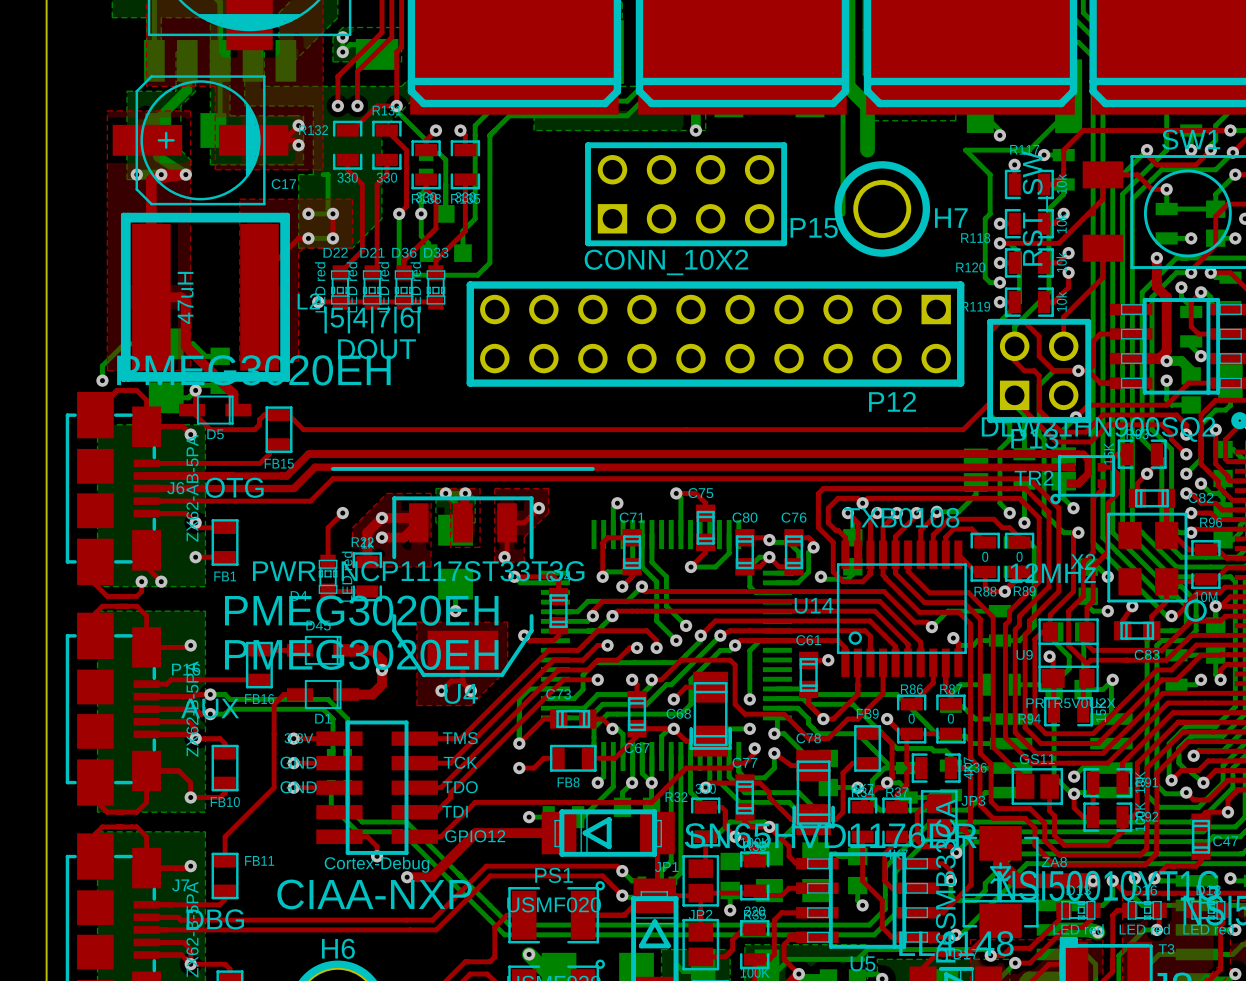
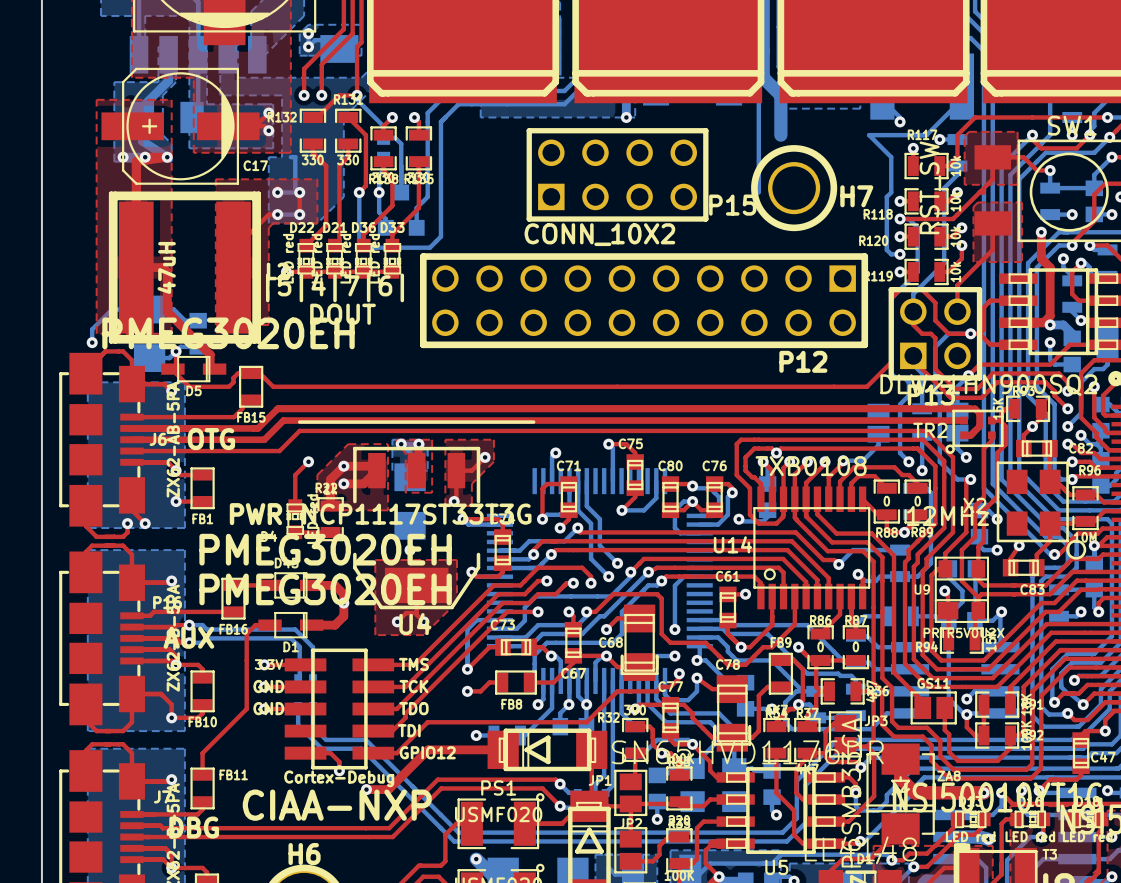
top zone outline: none -> (969, 131) (1017, 131) (1017, 184) (964, 184) (964, 136) (969, 131)
top zone outline: none -> (977, 202) (973, 206) (973, 262) (1022, 262) (1022, 202) (977, 202)

